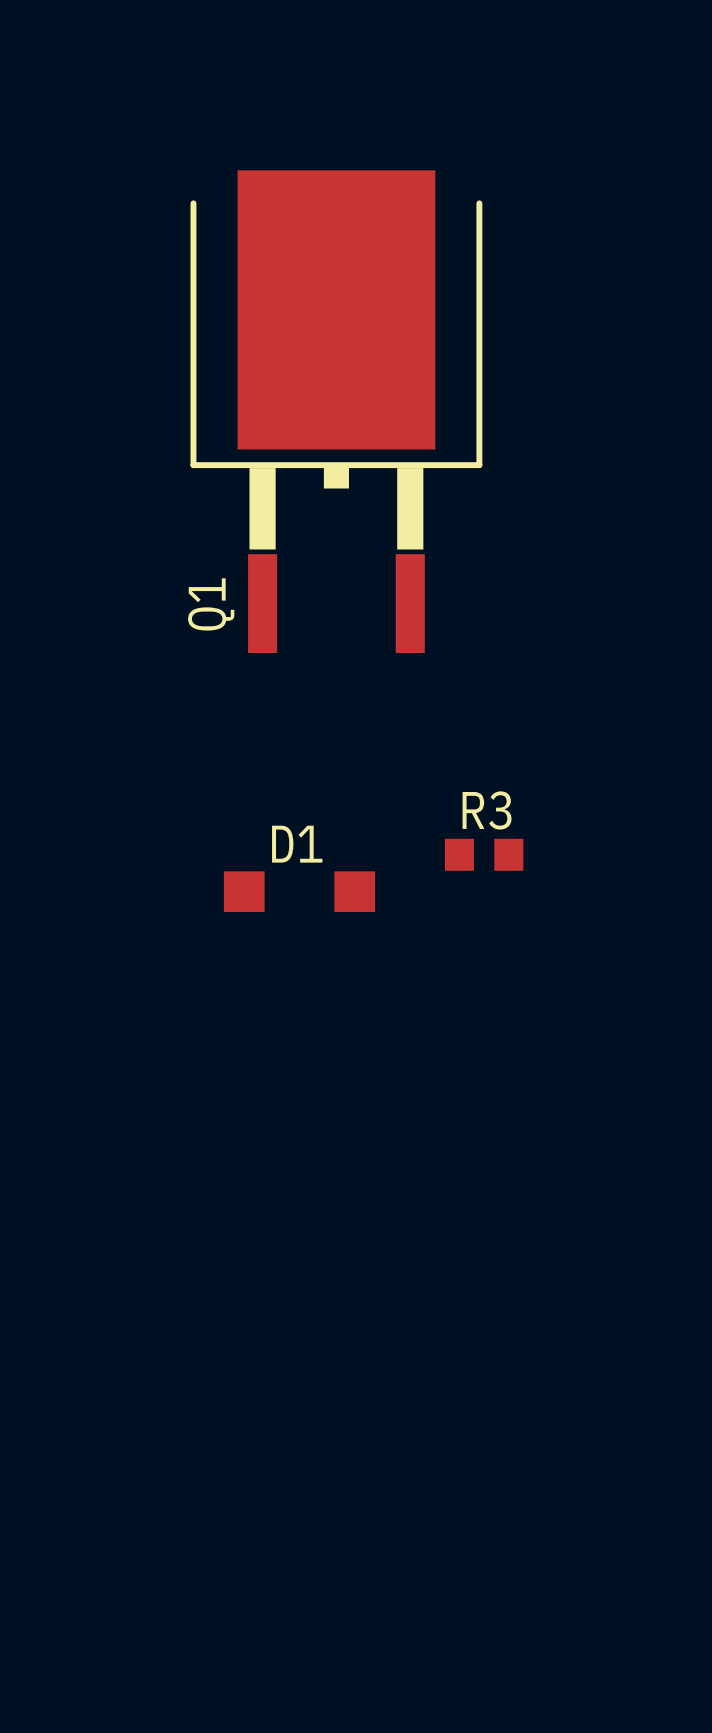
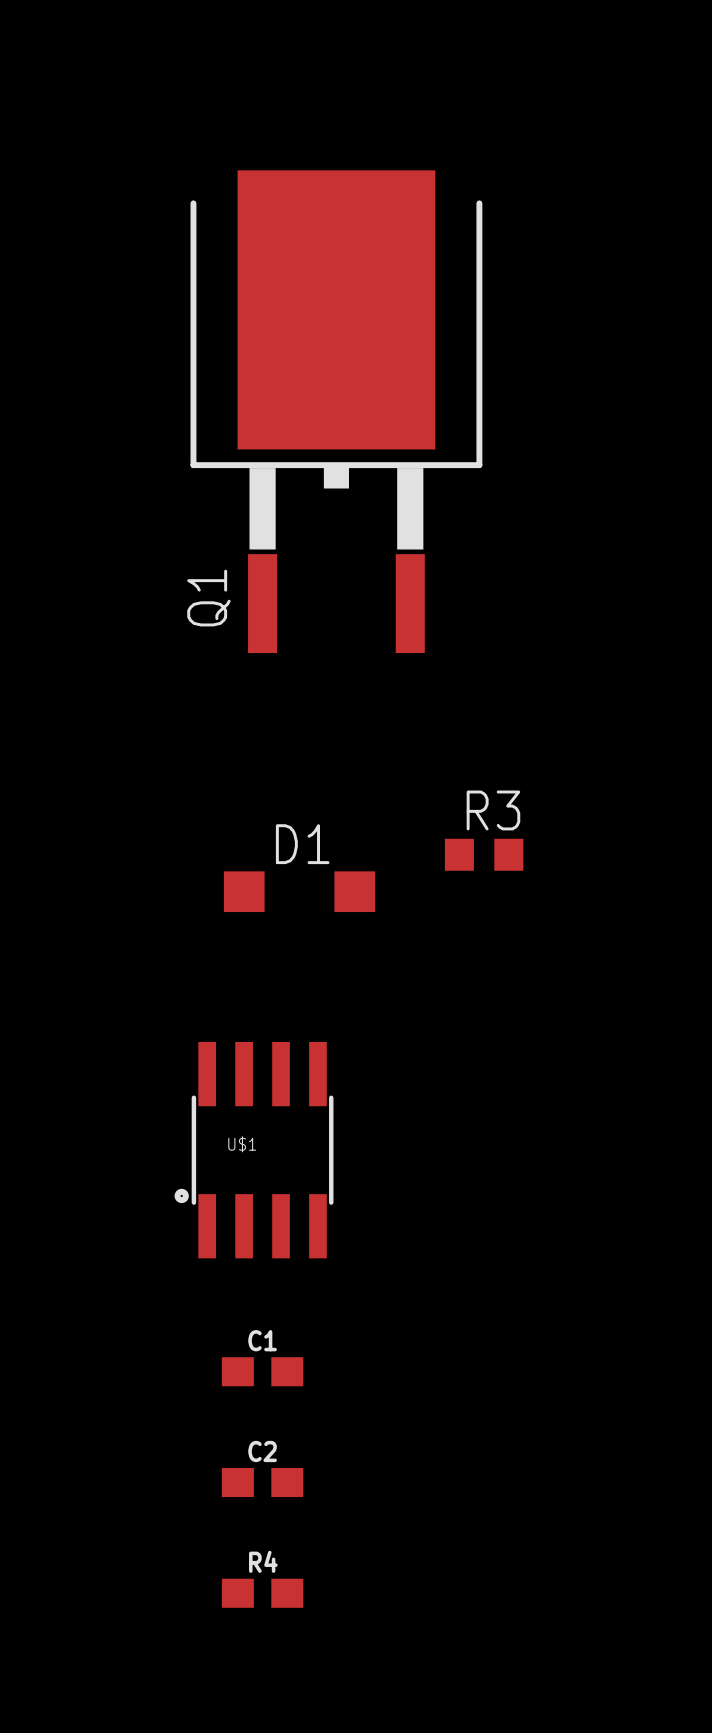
U$1: none -> (254, 1150)
C1: none -> (262, 1371)
C2: none -> (262, 1482)
R4: none -> (262, 1593)

